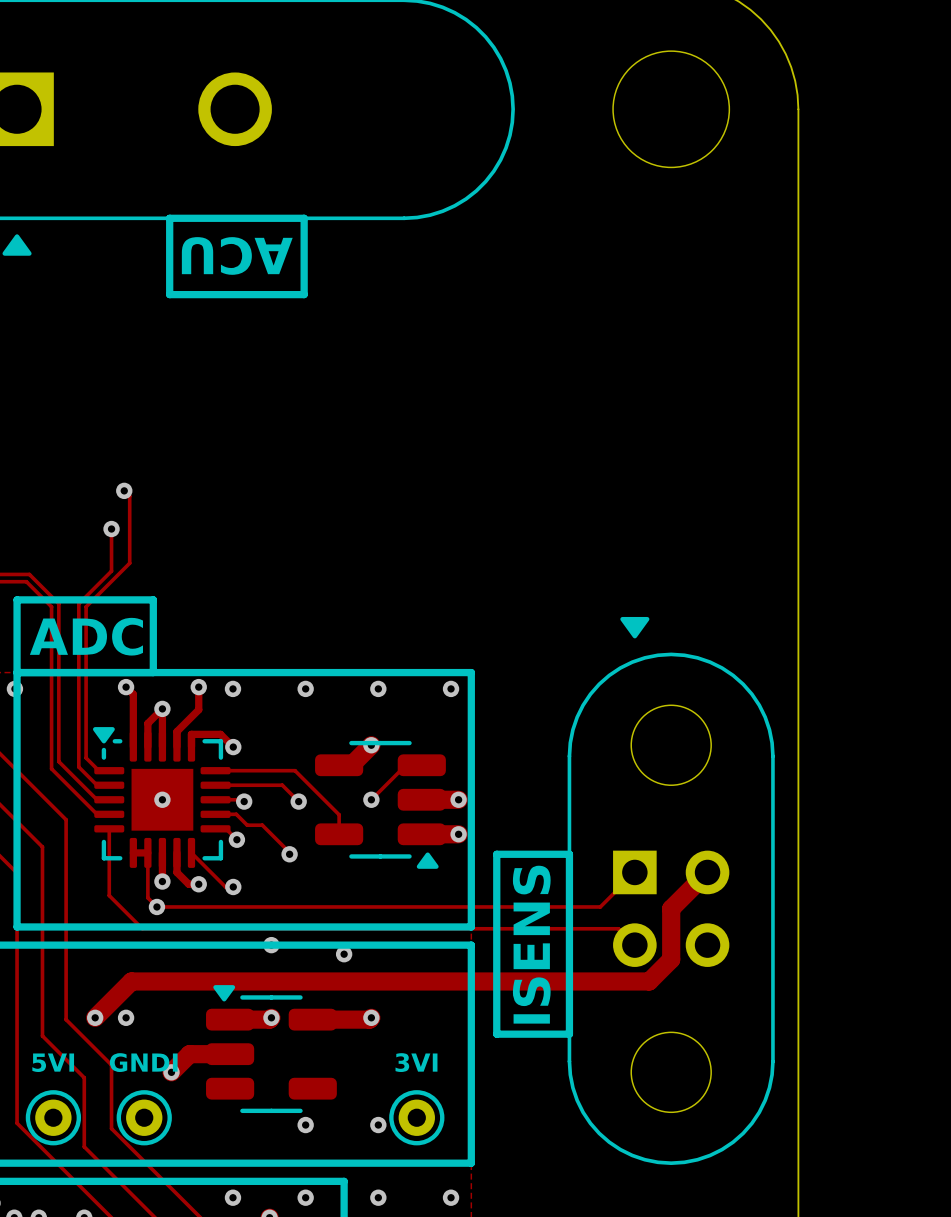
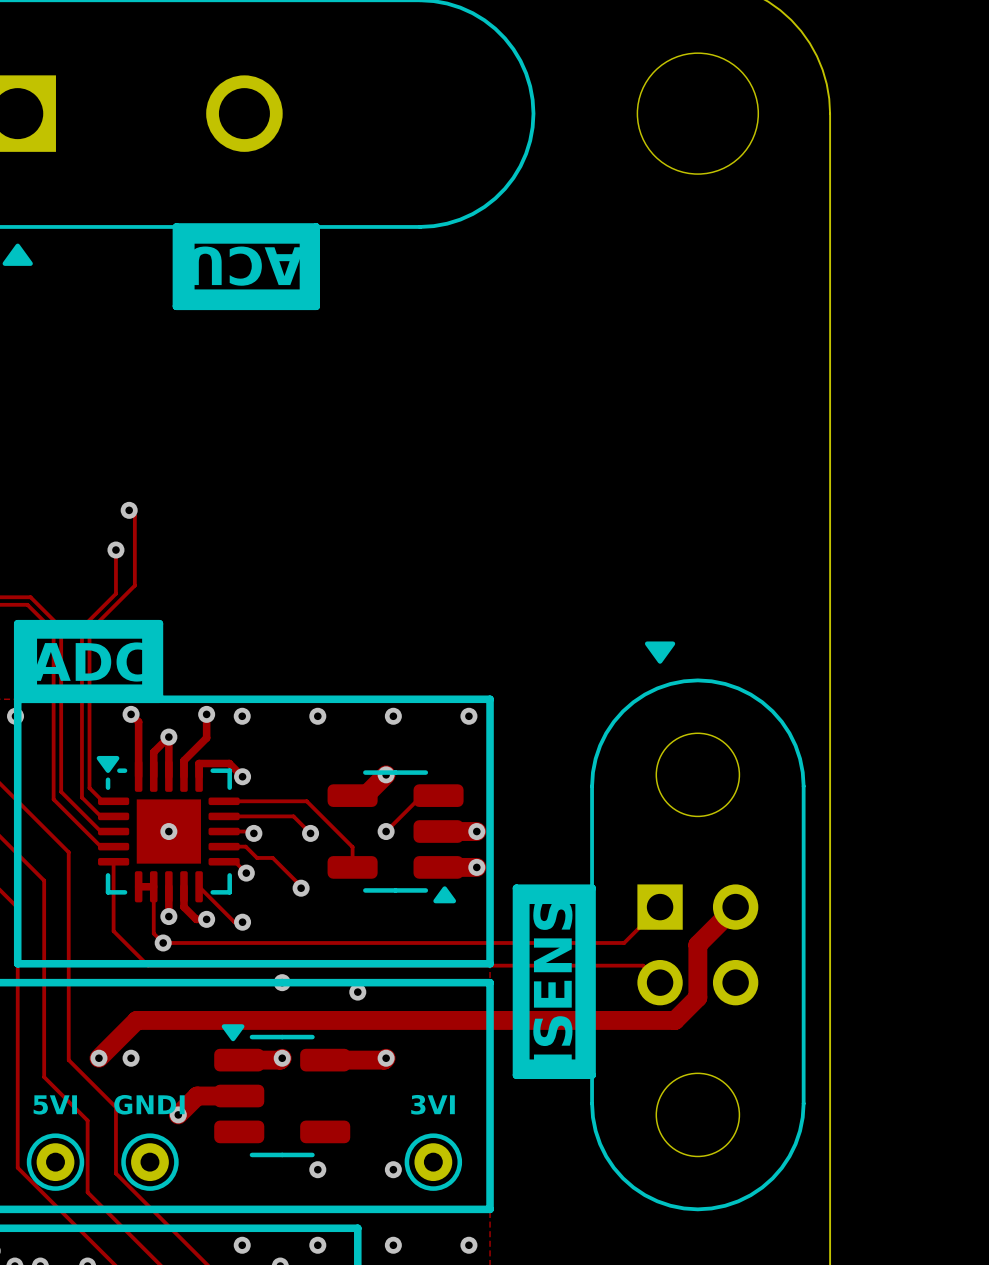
drawing: none -> [178, 228, 315, 305]
drawing: none -> [17, 623, 160, 700]
drawing: none -> [516, 888, 593, 1076]

